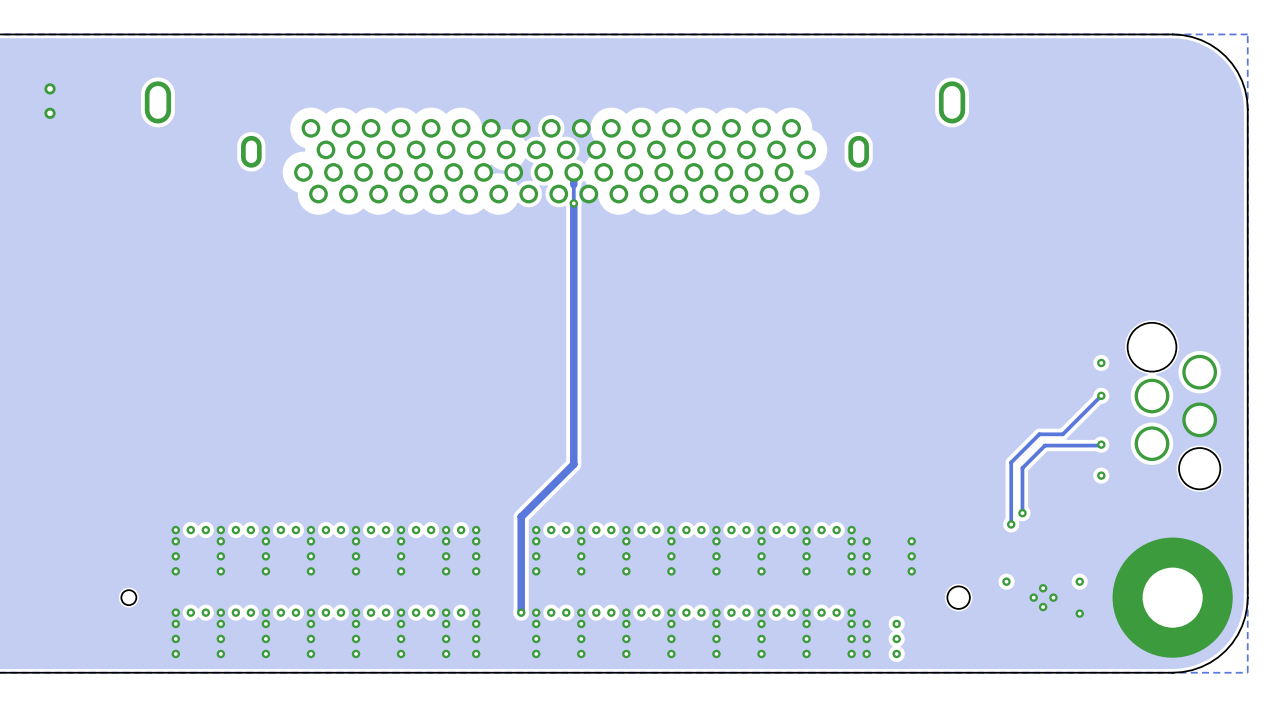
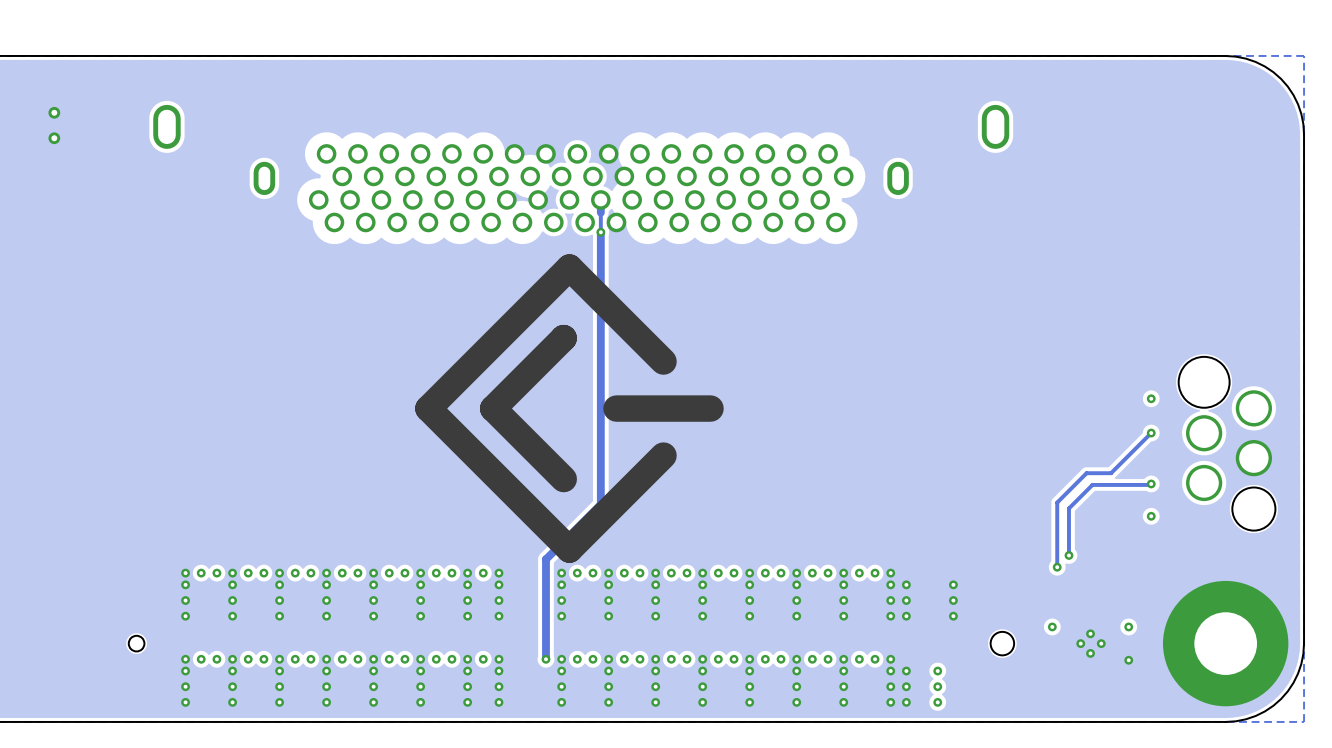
line: none -> (563, 338) (493, 408) (563, 479)
line: none -> (663, 361) (569, 267) (428, 408) (569, 549) (663, 455)
line: none -> (710, 408) (616, 408)

